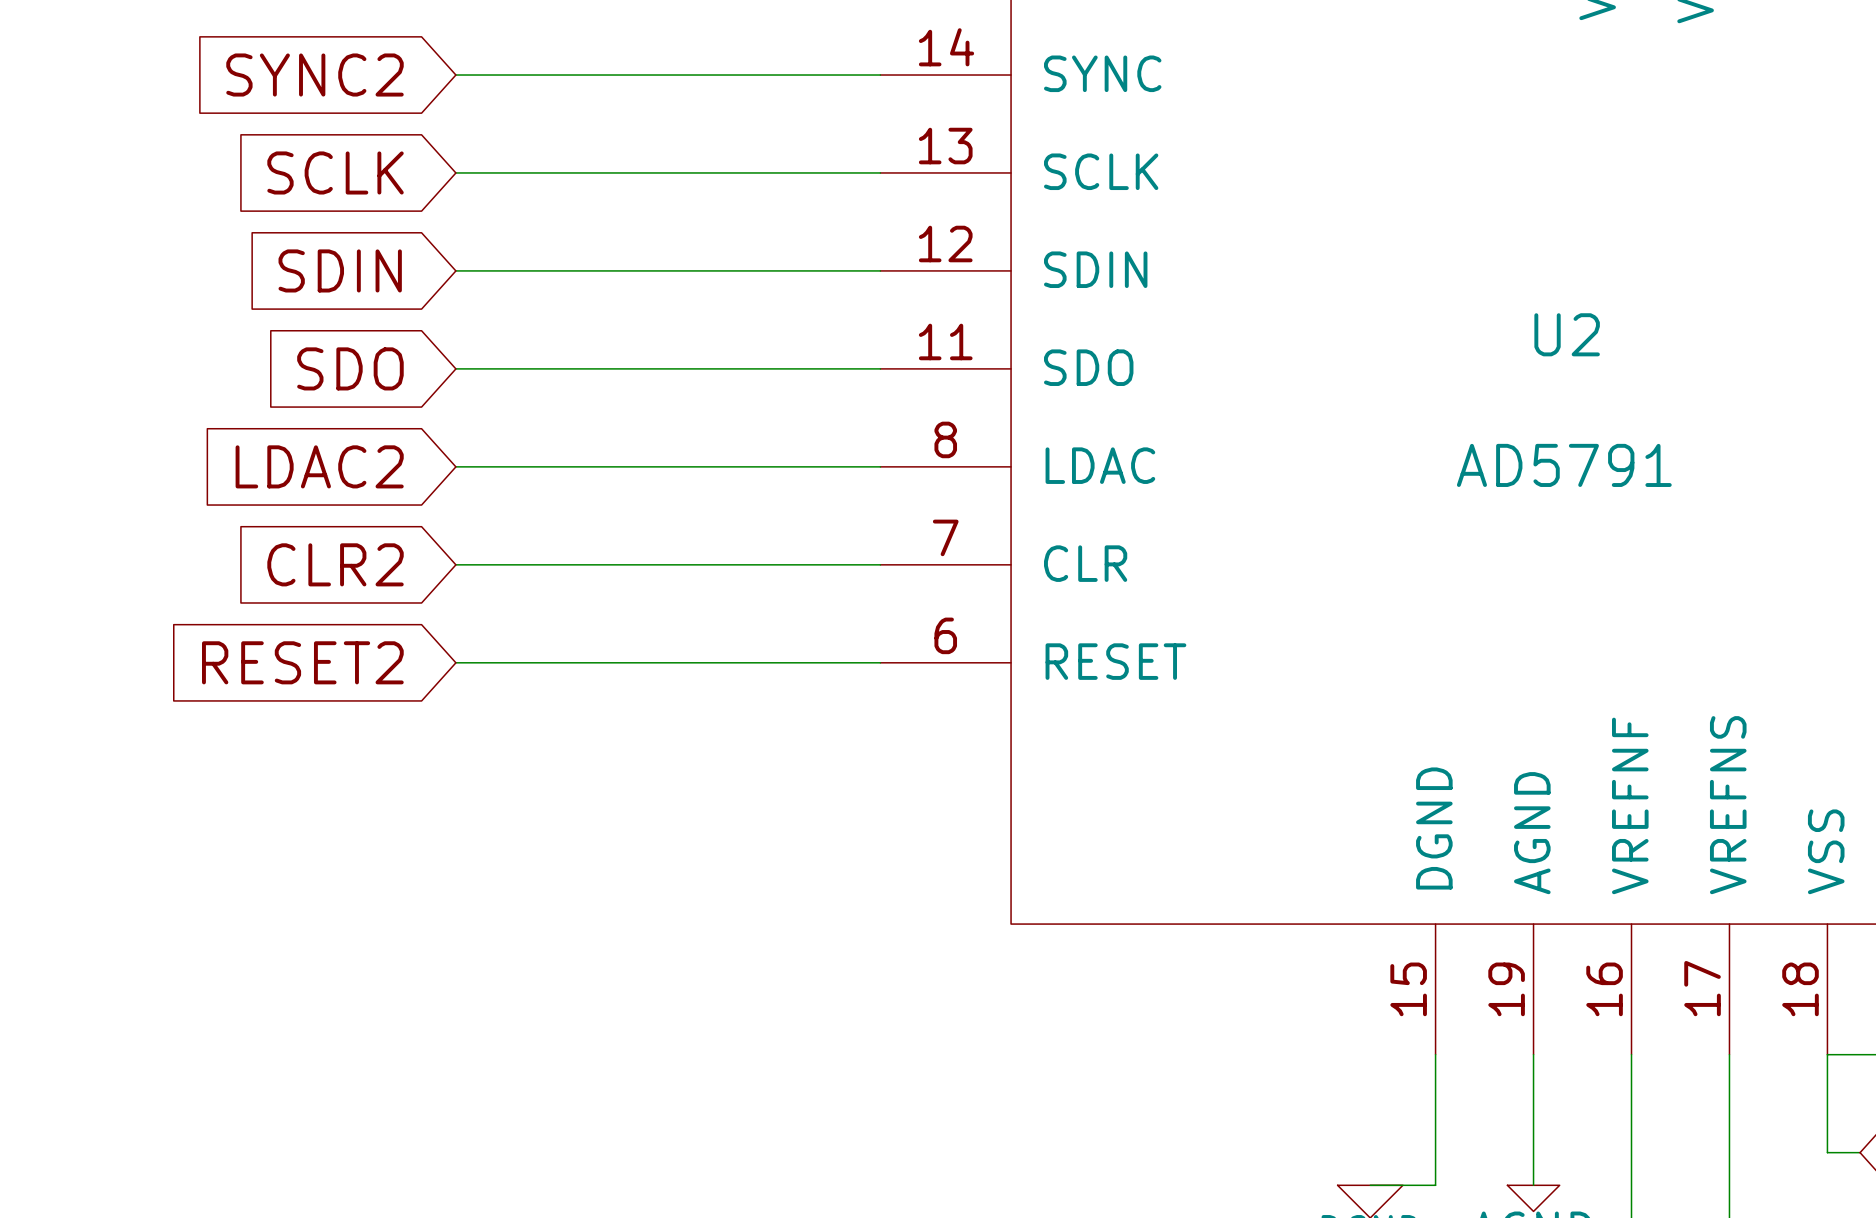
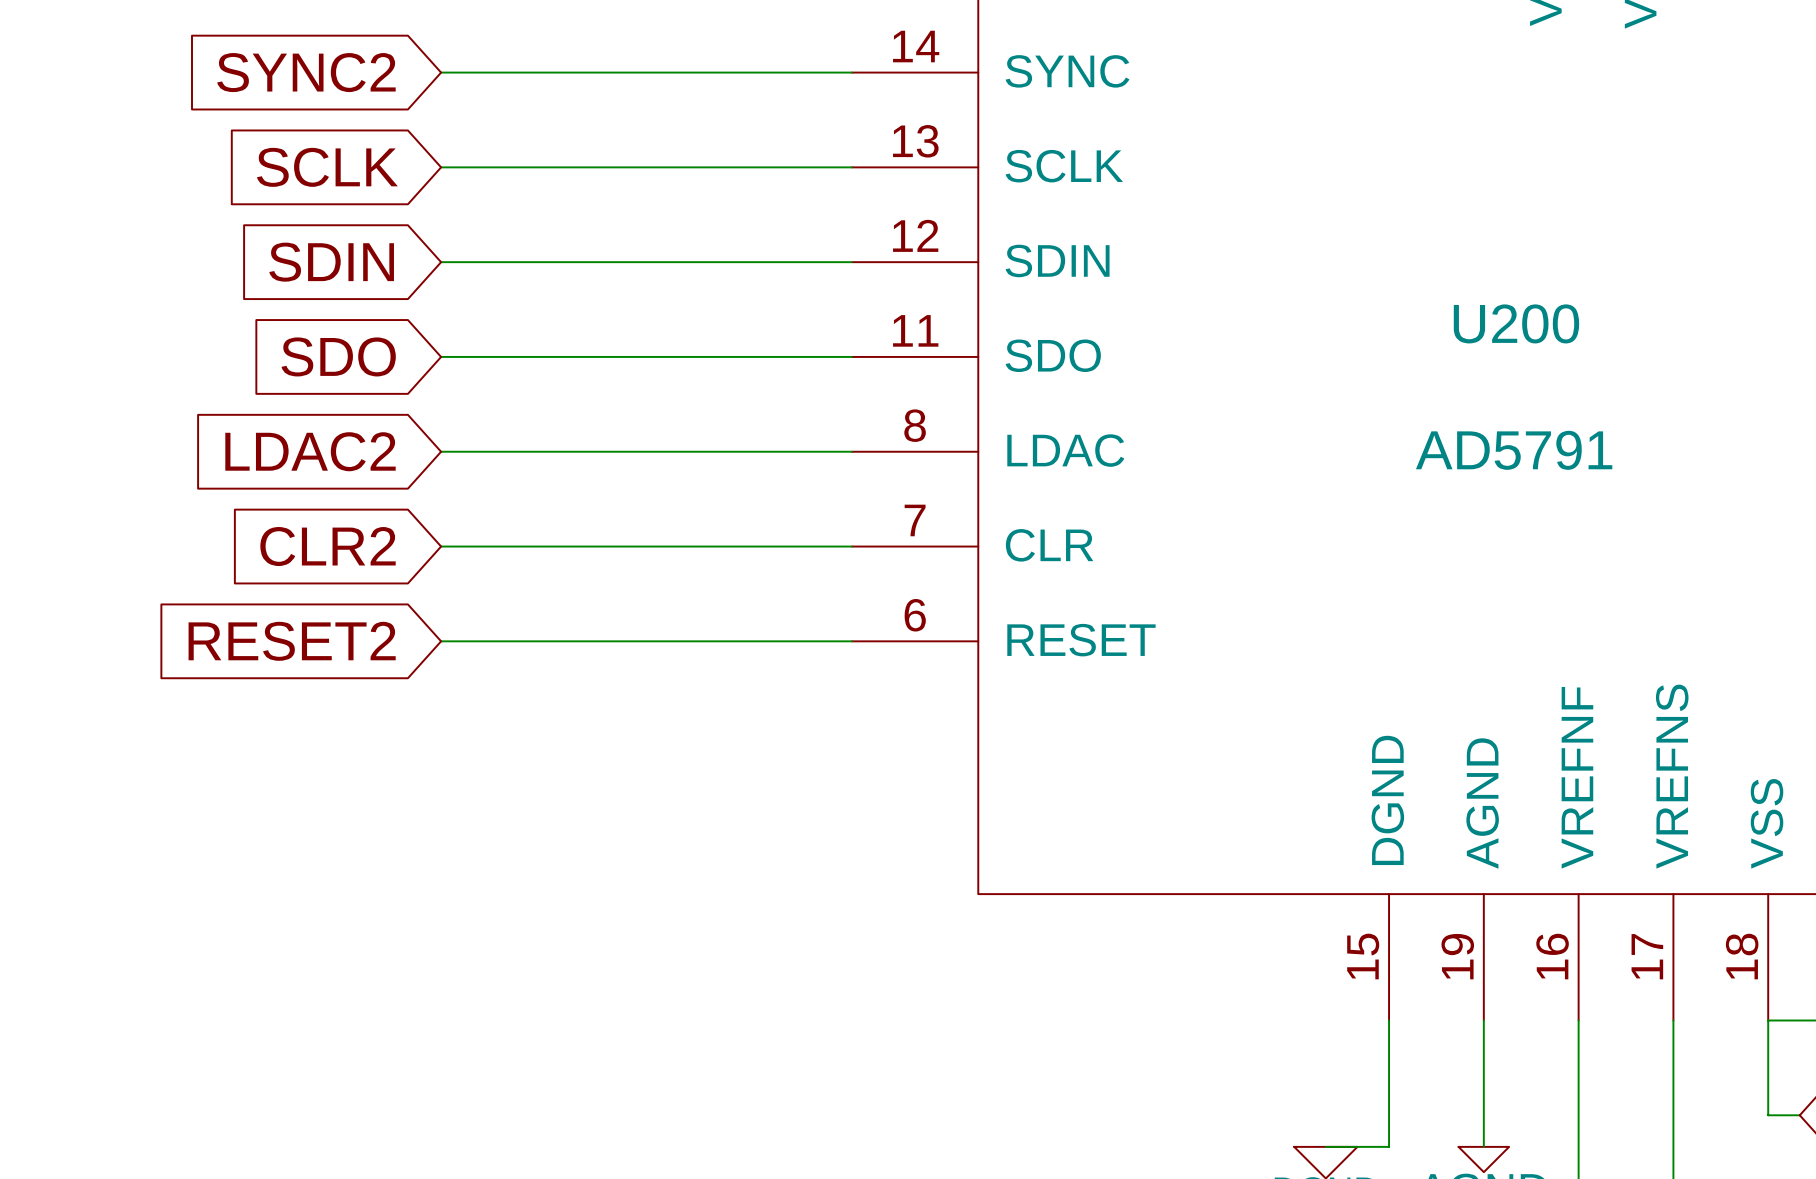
U2 name: U2 (1567, 334) -> U200 (1516, 323)

